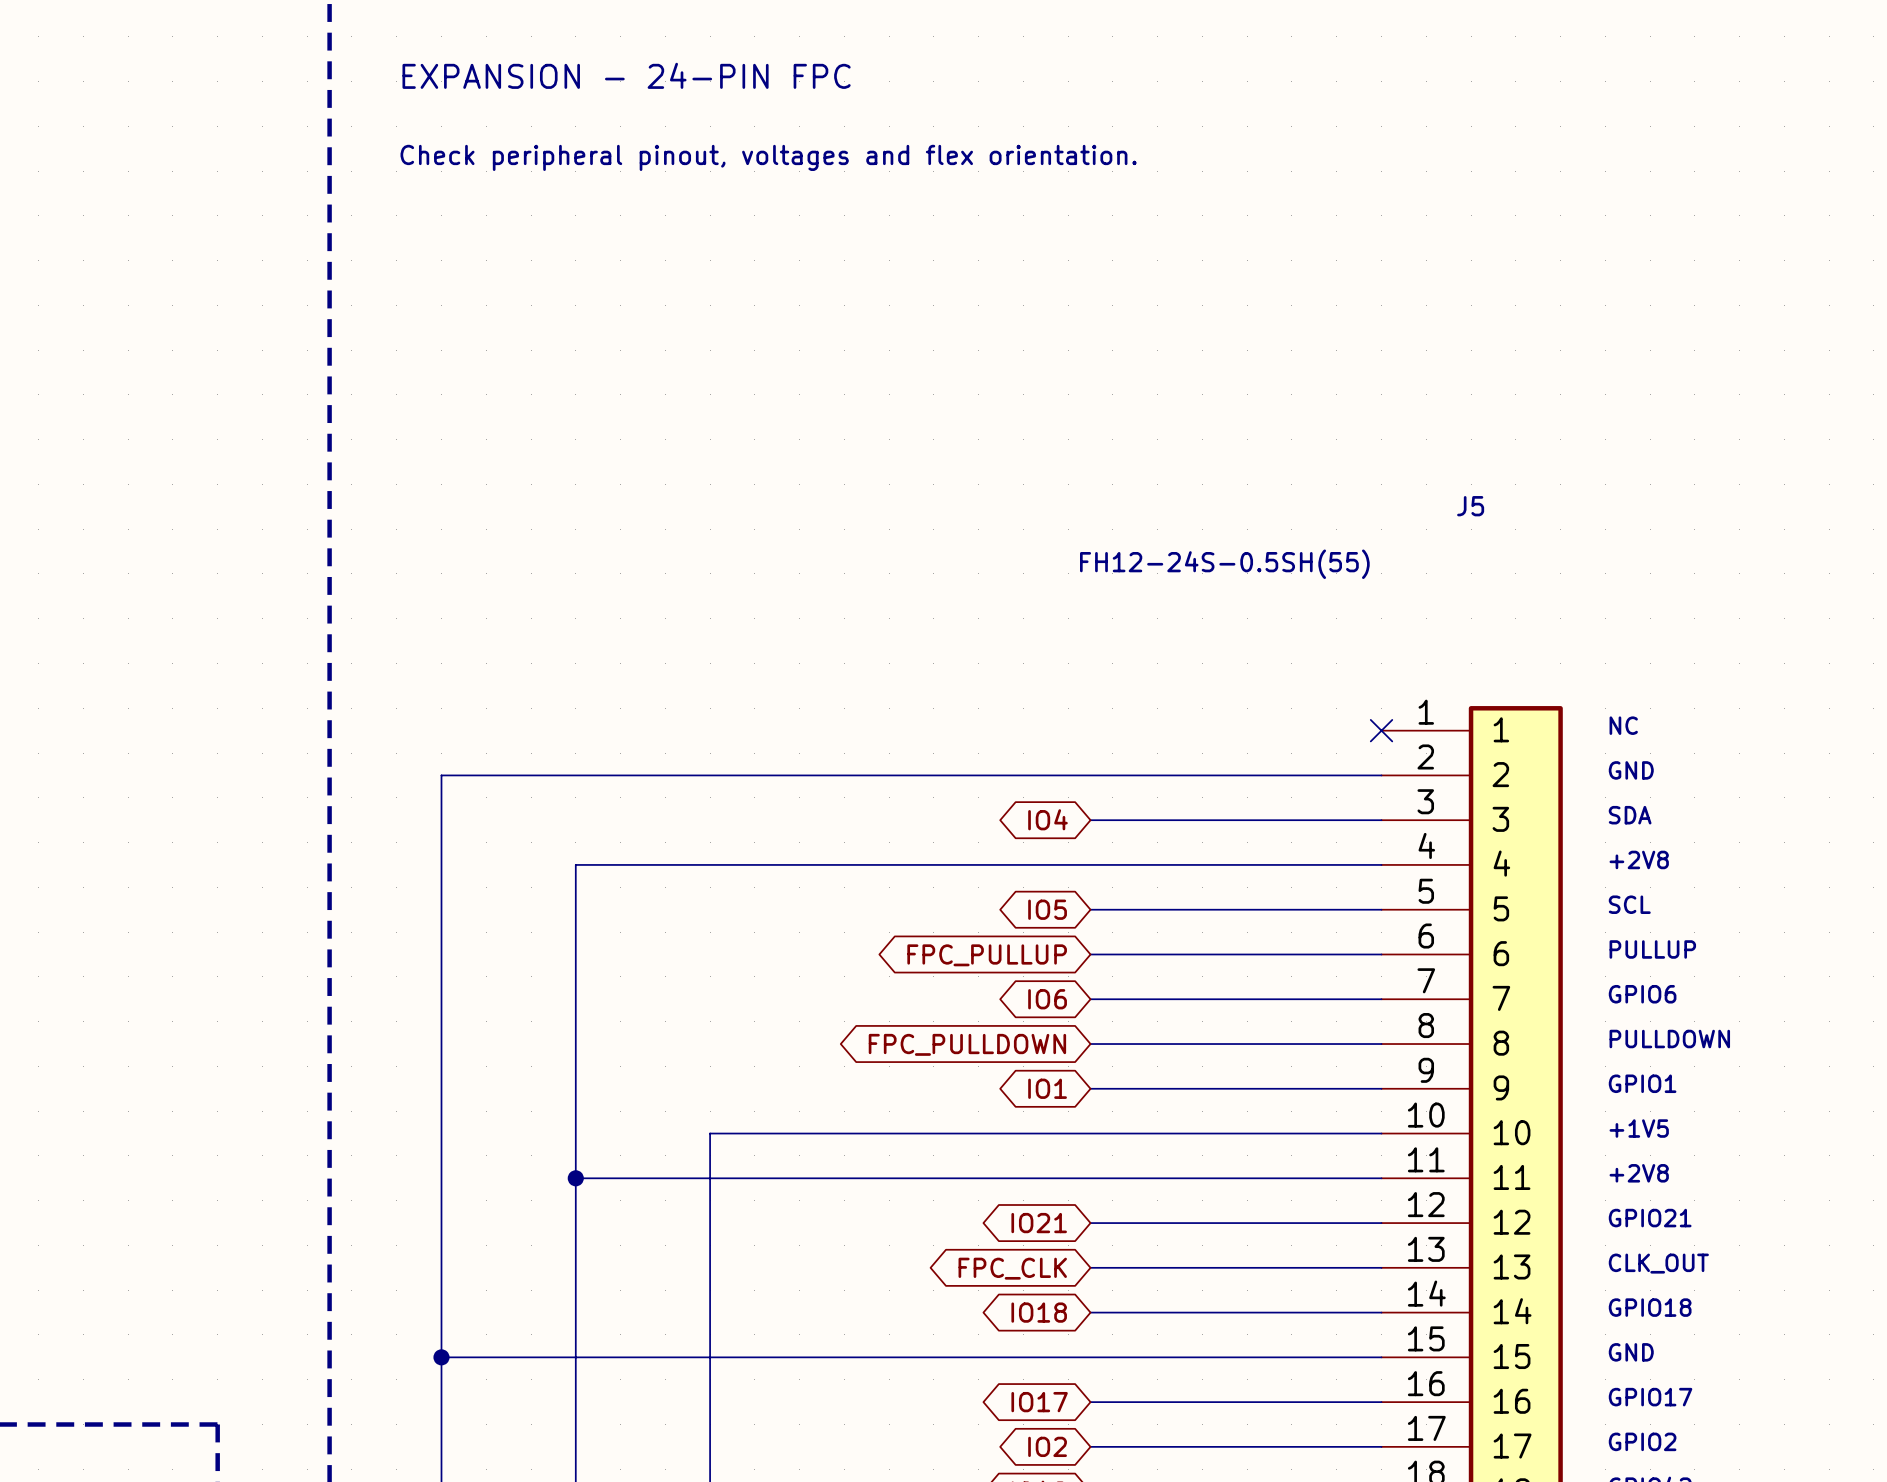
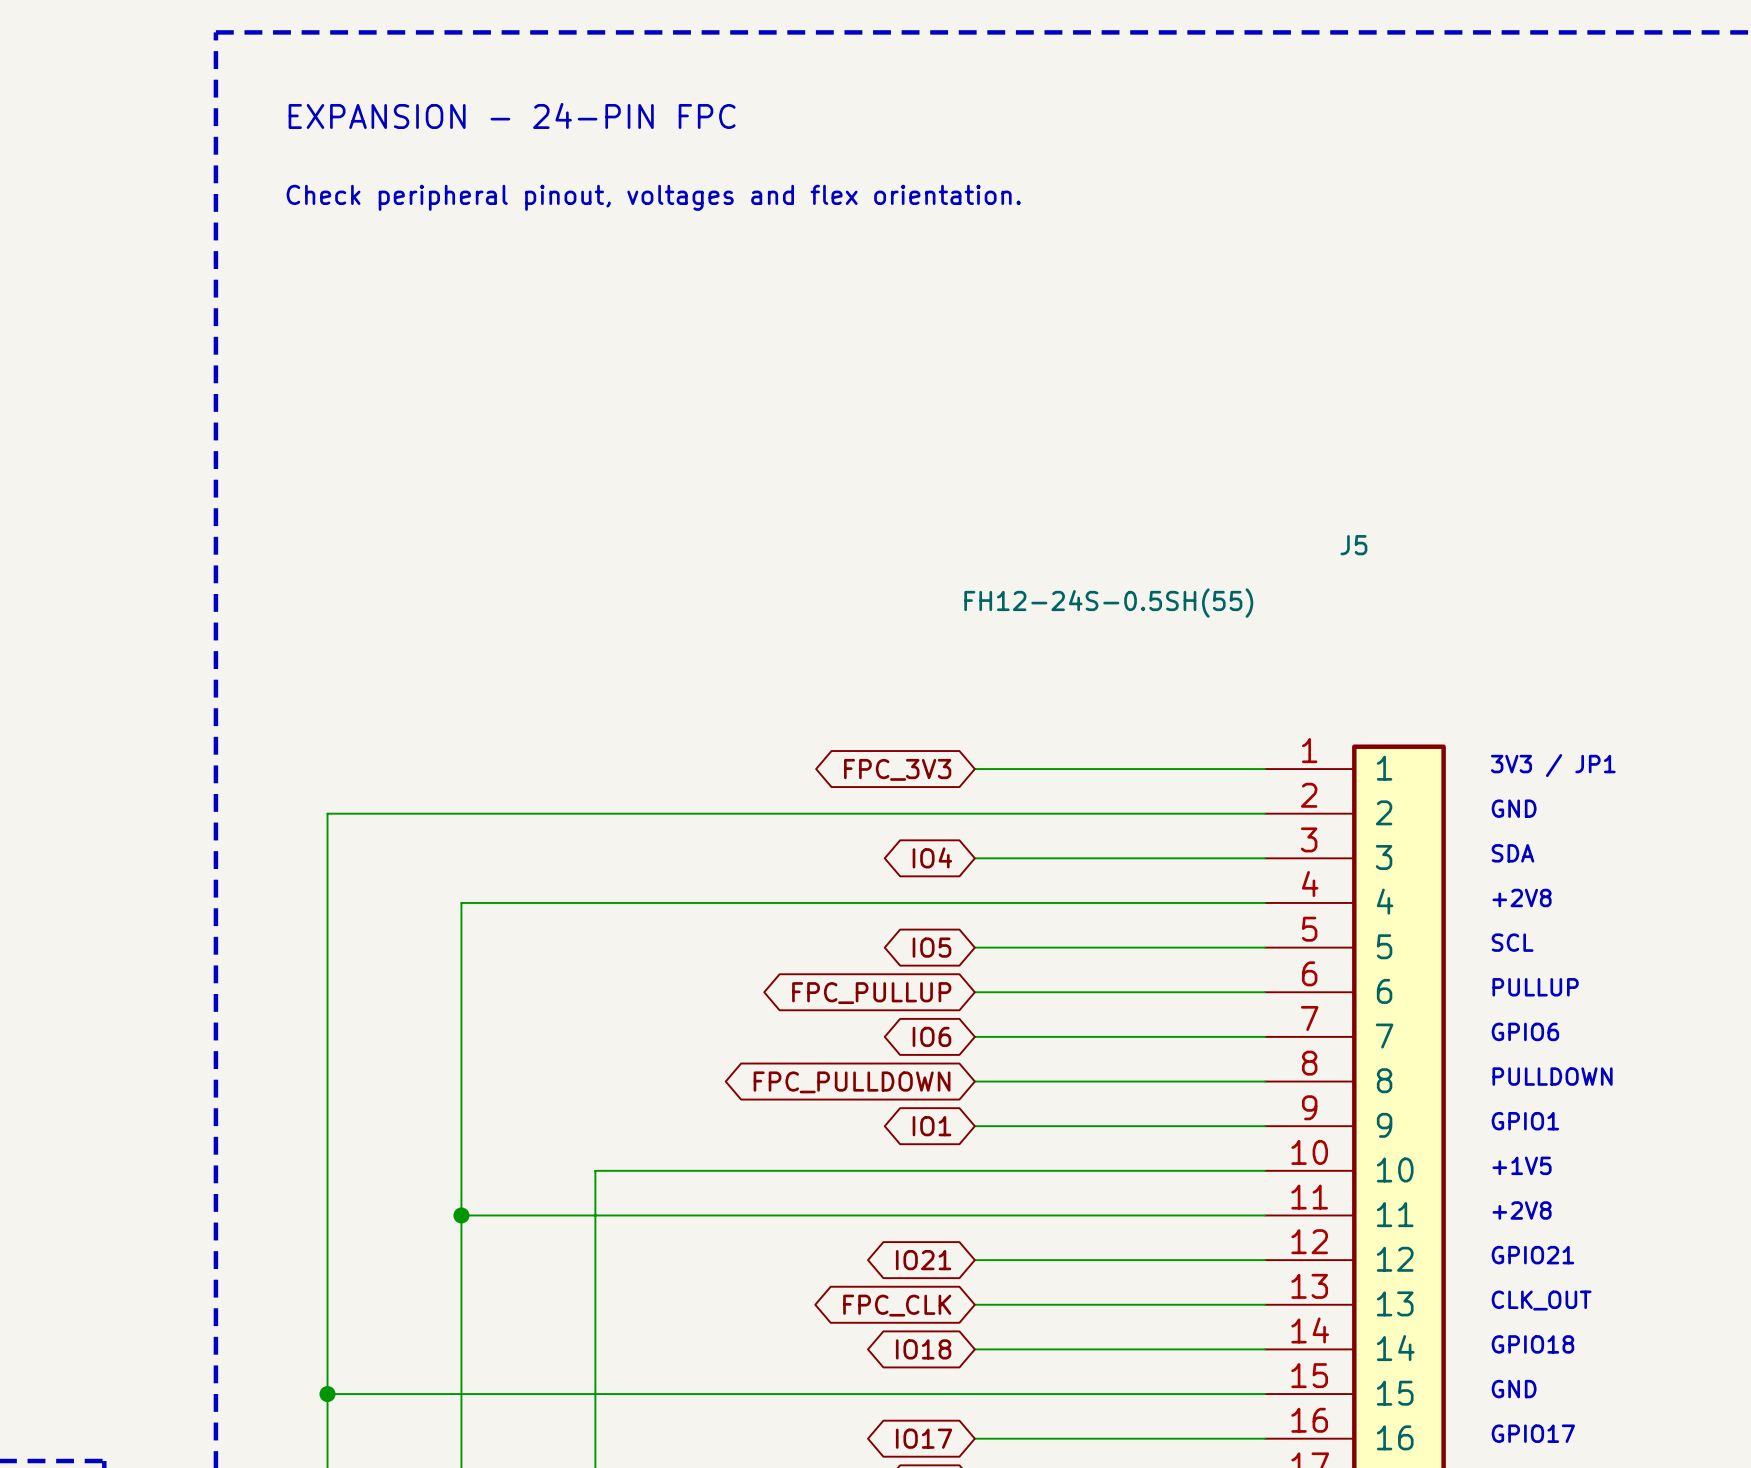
text: NC (1623, 725) -> 3V3 / JP1 (1553, 765)
wire: none -> (974, 769) (1265, 769)
no-connect mark: (1381, 730) -> none
global label: none -> FPC_3V3 (897, 769)

